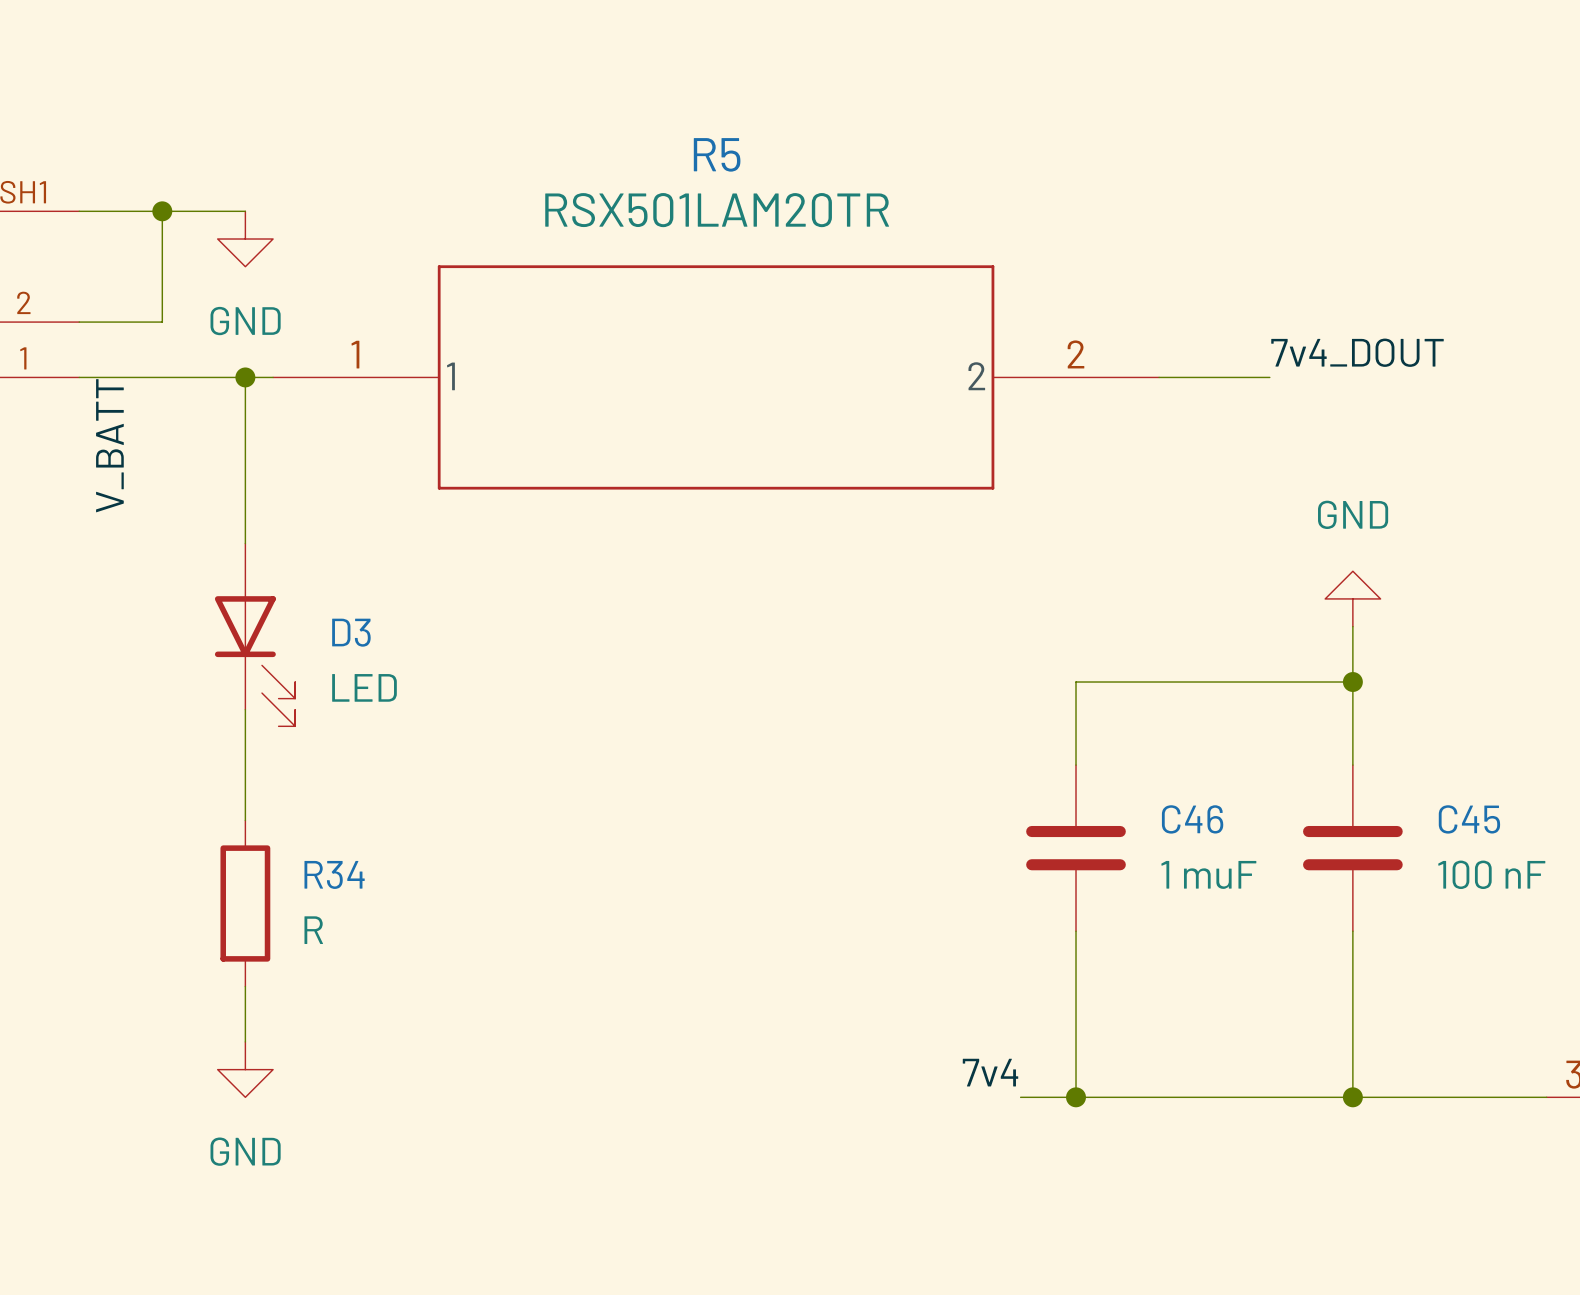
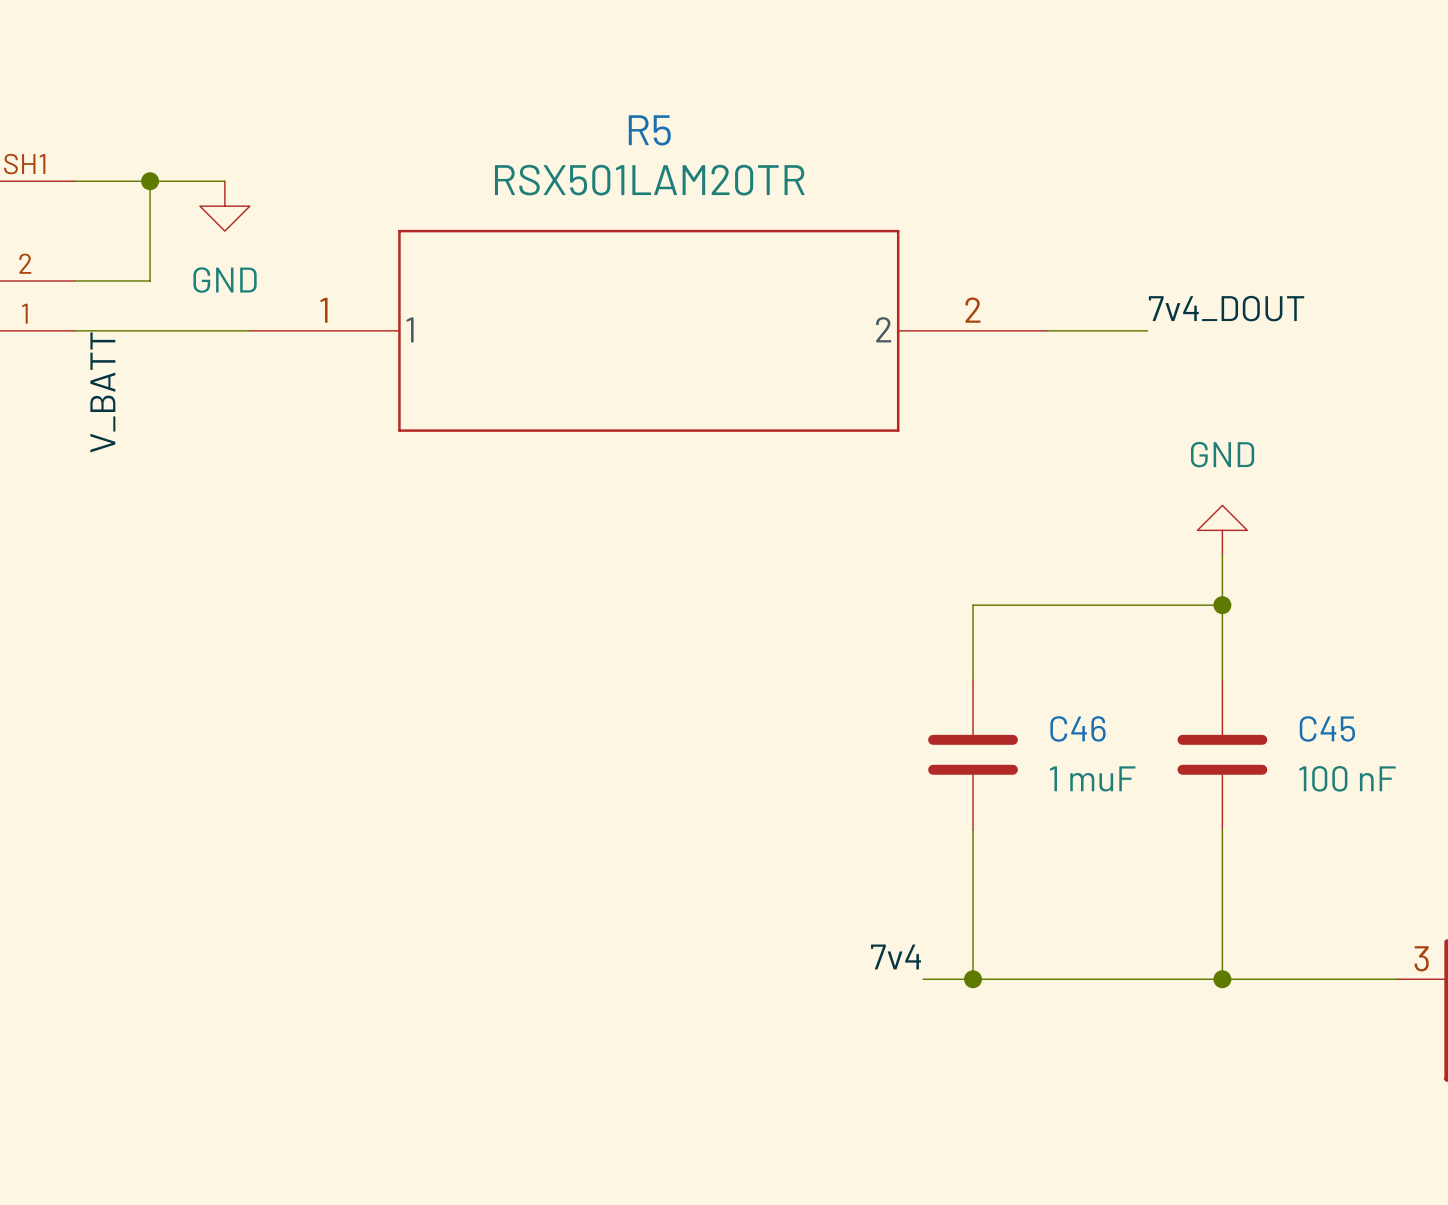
wire: (245, 377) (245, 543) -> none
junction: (245, 377) -> none
D3: LED (255, 634) -> none
wire: (245, 709) (245, 820) -> none
R34: R (245, 903) -> none
wire: (245, 986) (245, 1041) -> none
power symbol: GND (245, 1069) -> none

